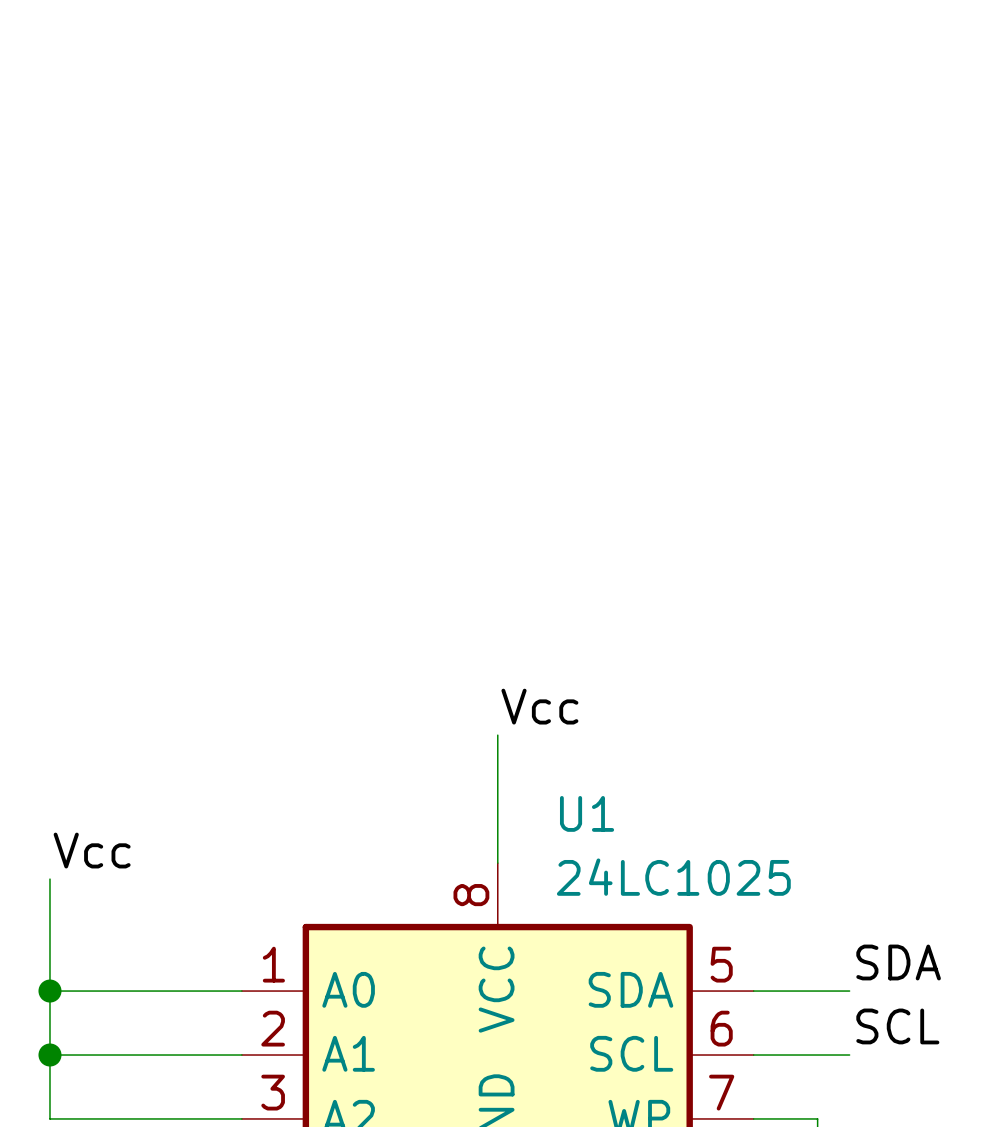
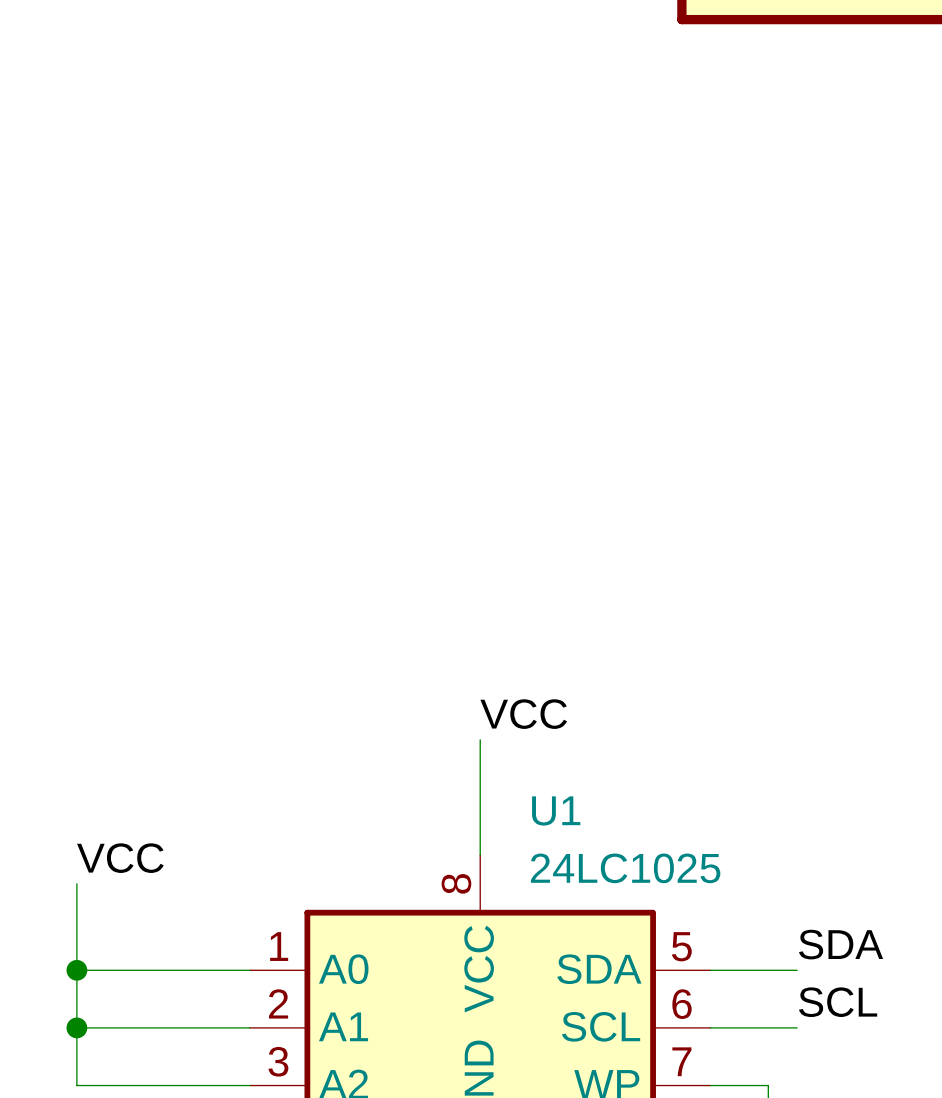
label: Vcc (539, 706) -> VCC (523, 714)
label: Vcc (92, 850) -> VCC (120, 858)
wire: (49, 879) (49, 895) -> none

